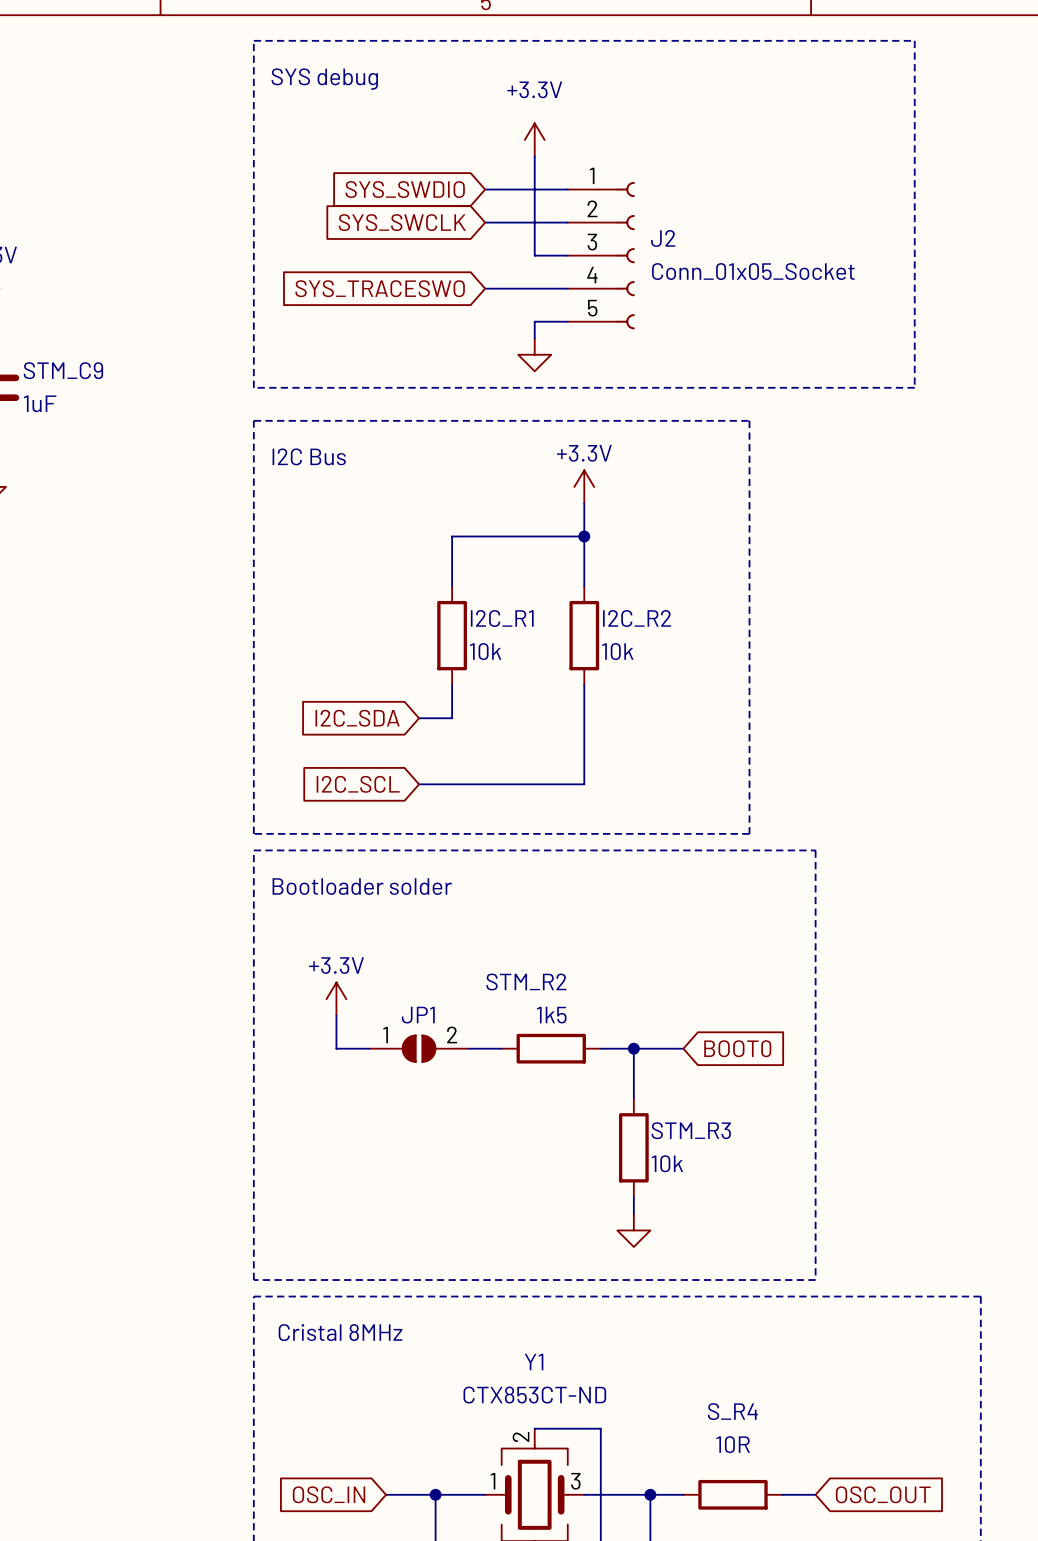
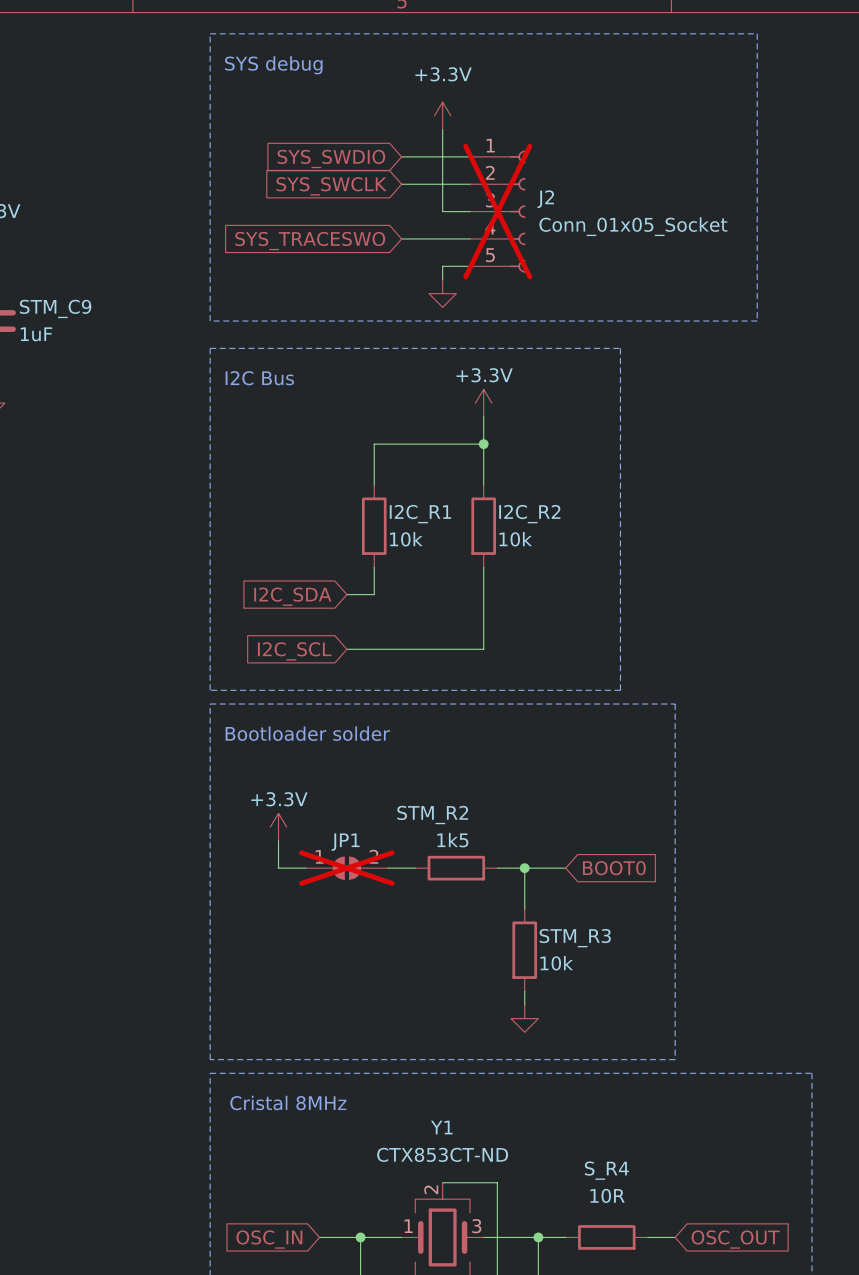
J2 do-not-place cross: none -> (497, 211)
JP1 do-not-place cross: none -> (346, 868)

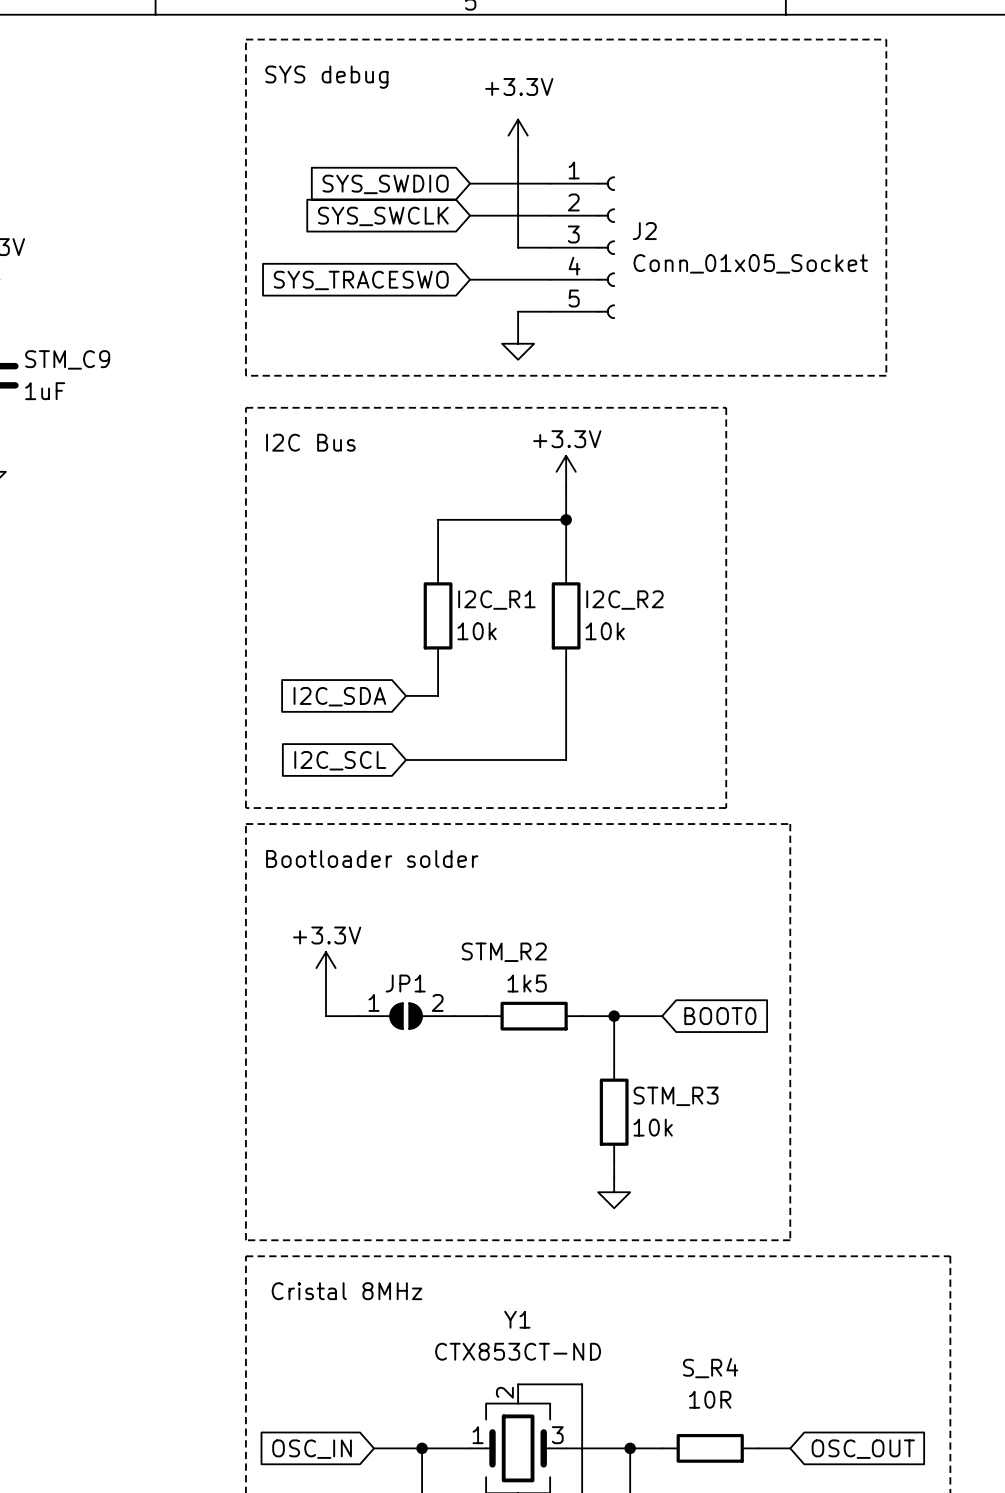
J2 do-not-place cross: (497, 211) -> none
JP1 do-not-place cross: (346, 868) -> none

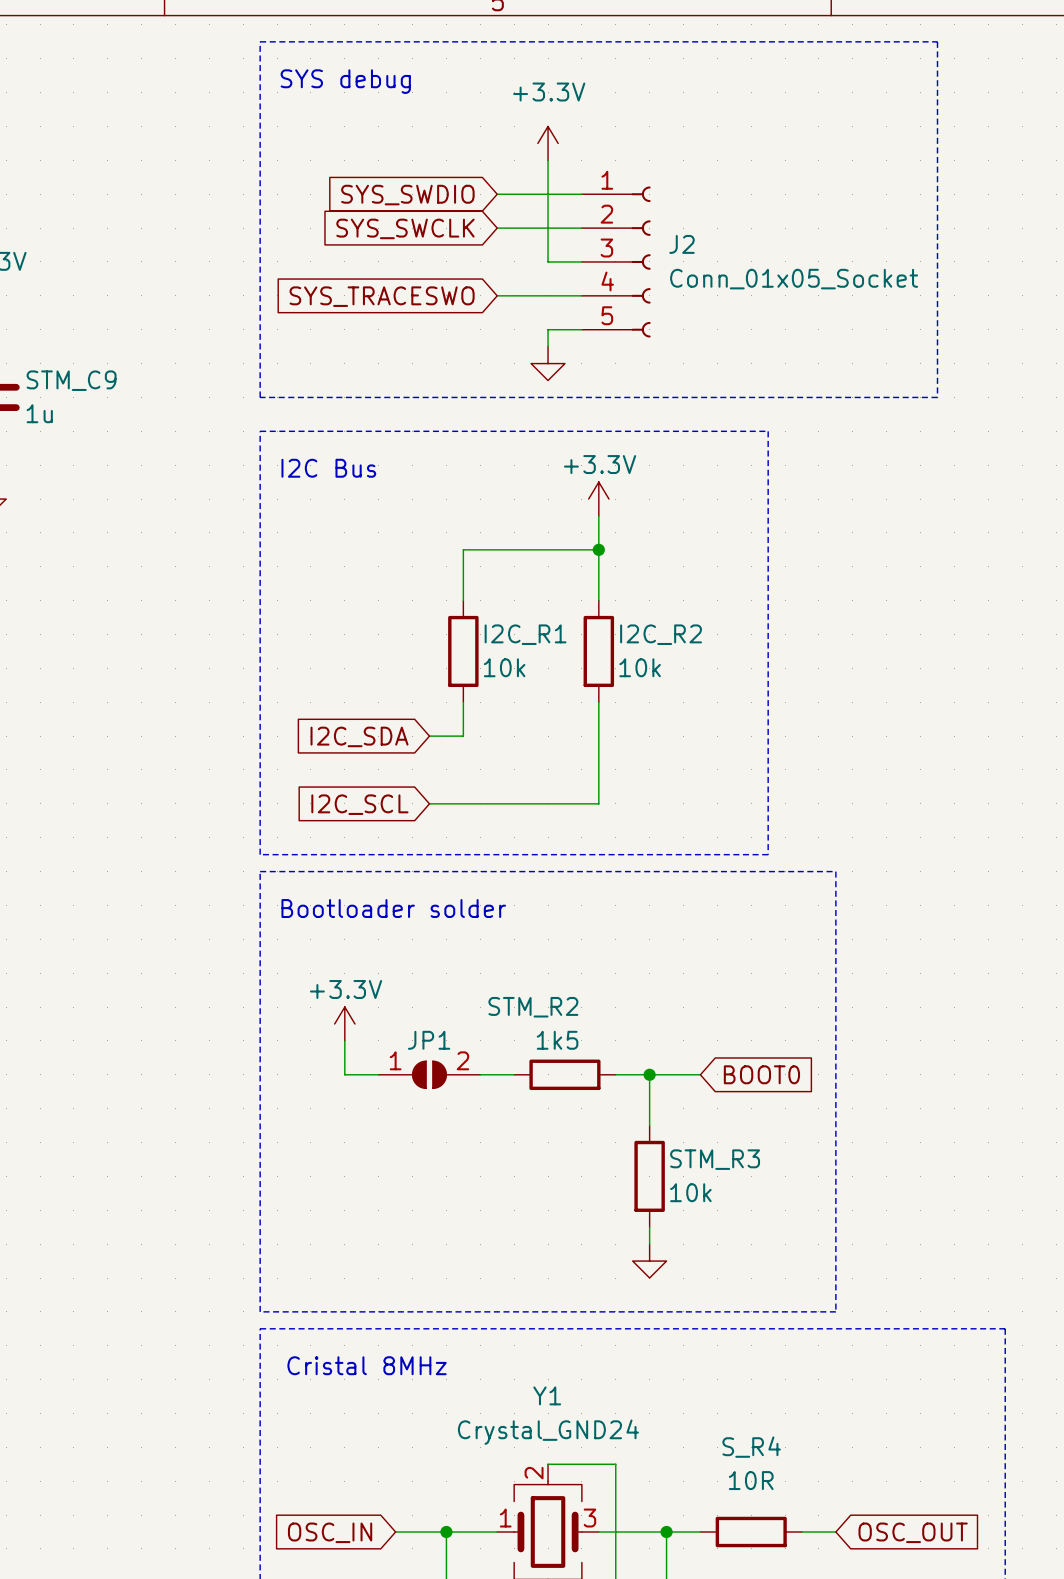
STM_C9 value: 1uF (45, 391) -> 1u (39, 413)
Y1 value: CTX853CT-ND (518, 1351) -> Crystal_GND24 (548, 1432)

